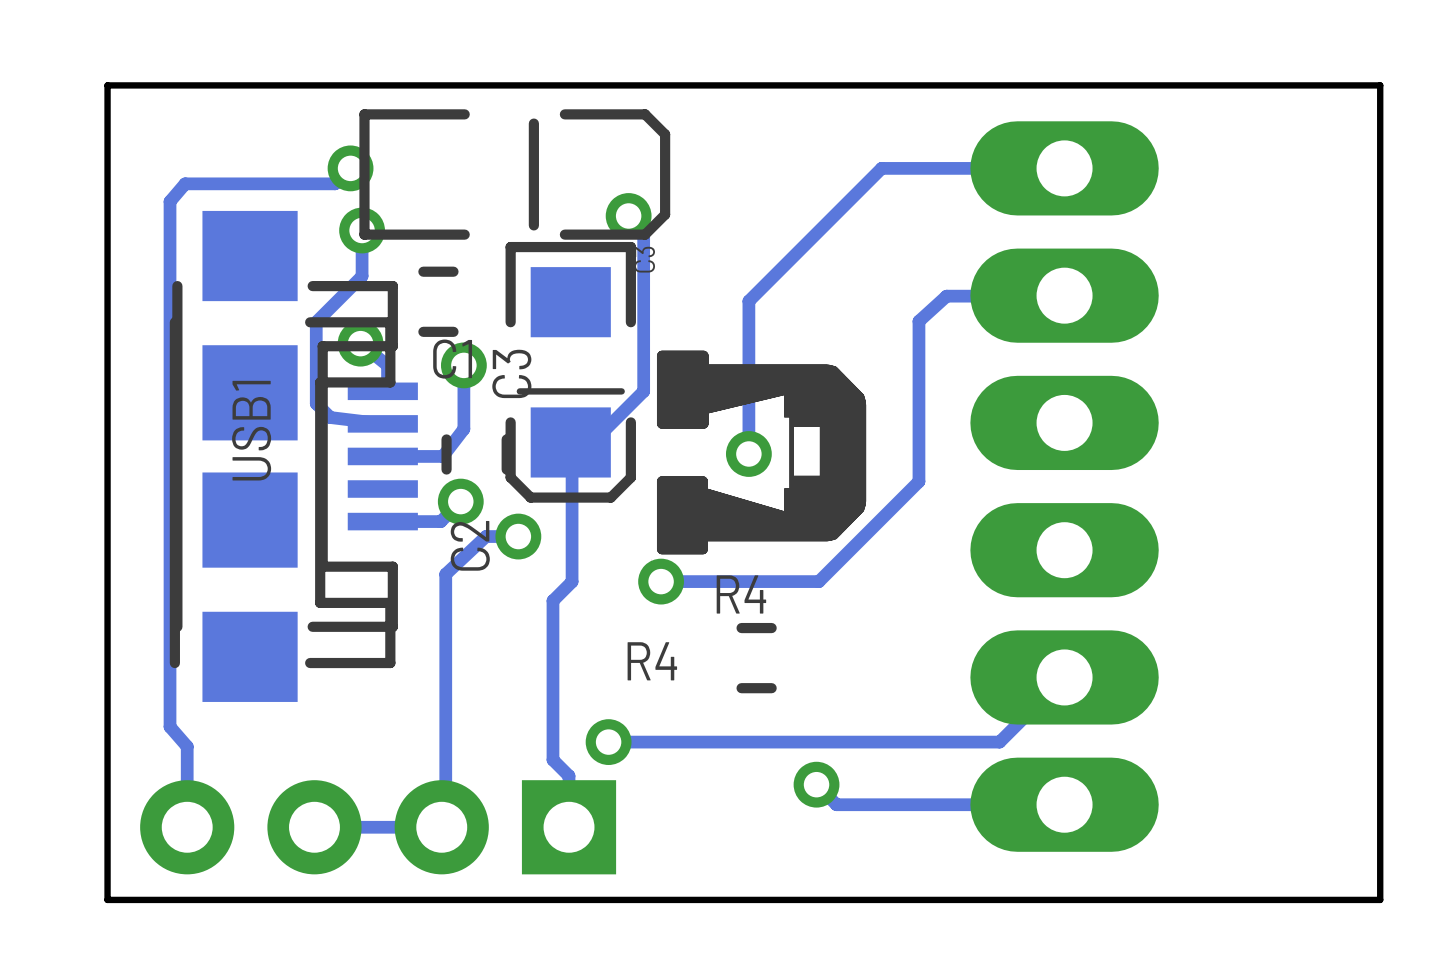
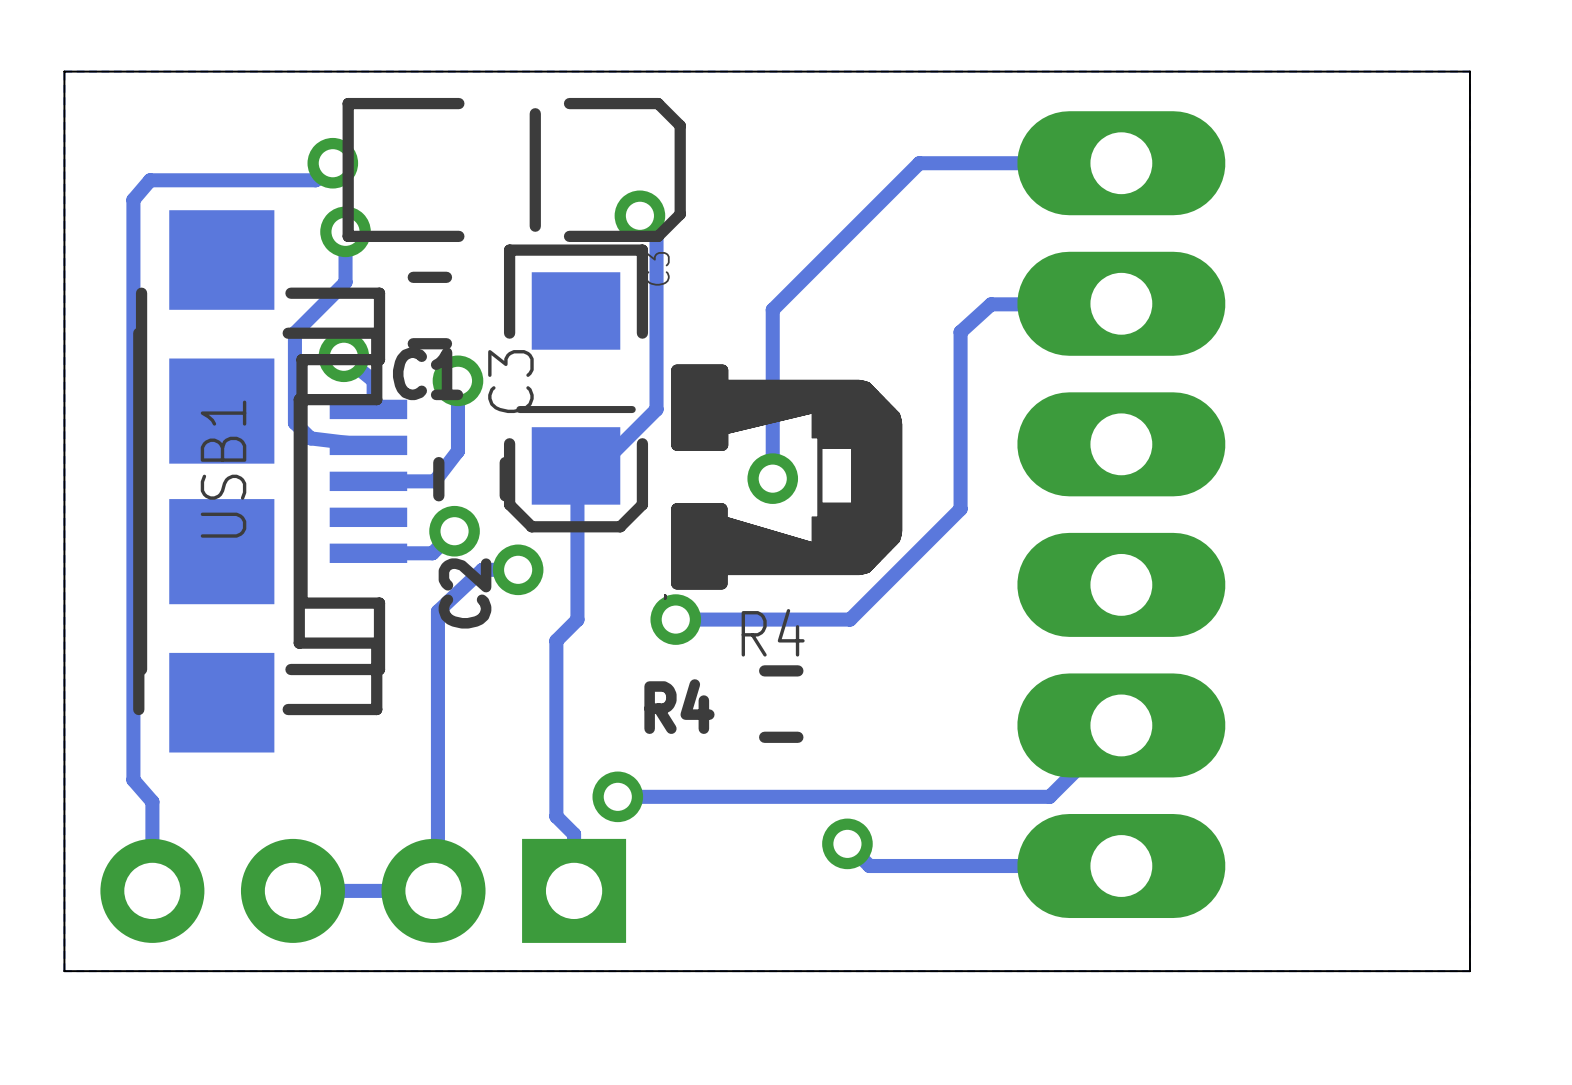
board edge width: thick (1380, 85) (107, 85) (107, 899) (1380, 899) (1380, 85) -> thin (1469, 71) (64, 71) (64, 971) (1469, 971) (1469, 71)

